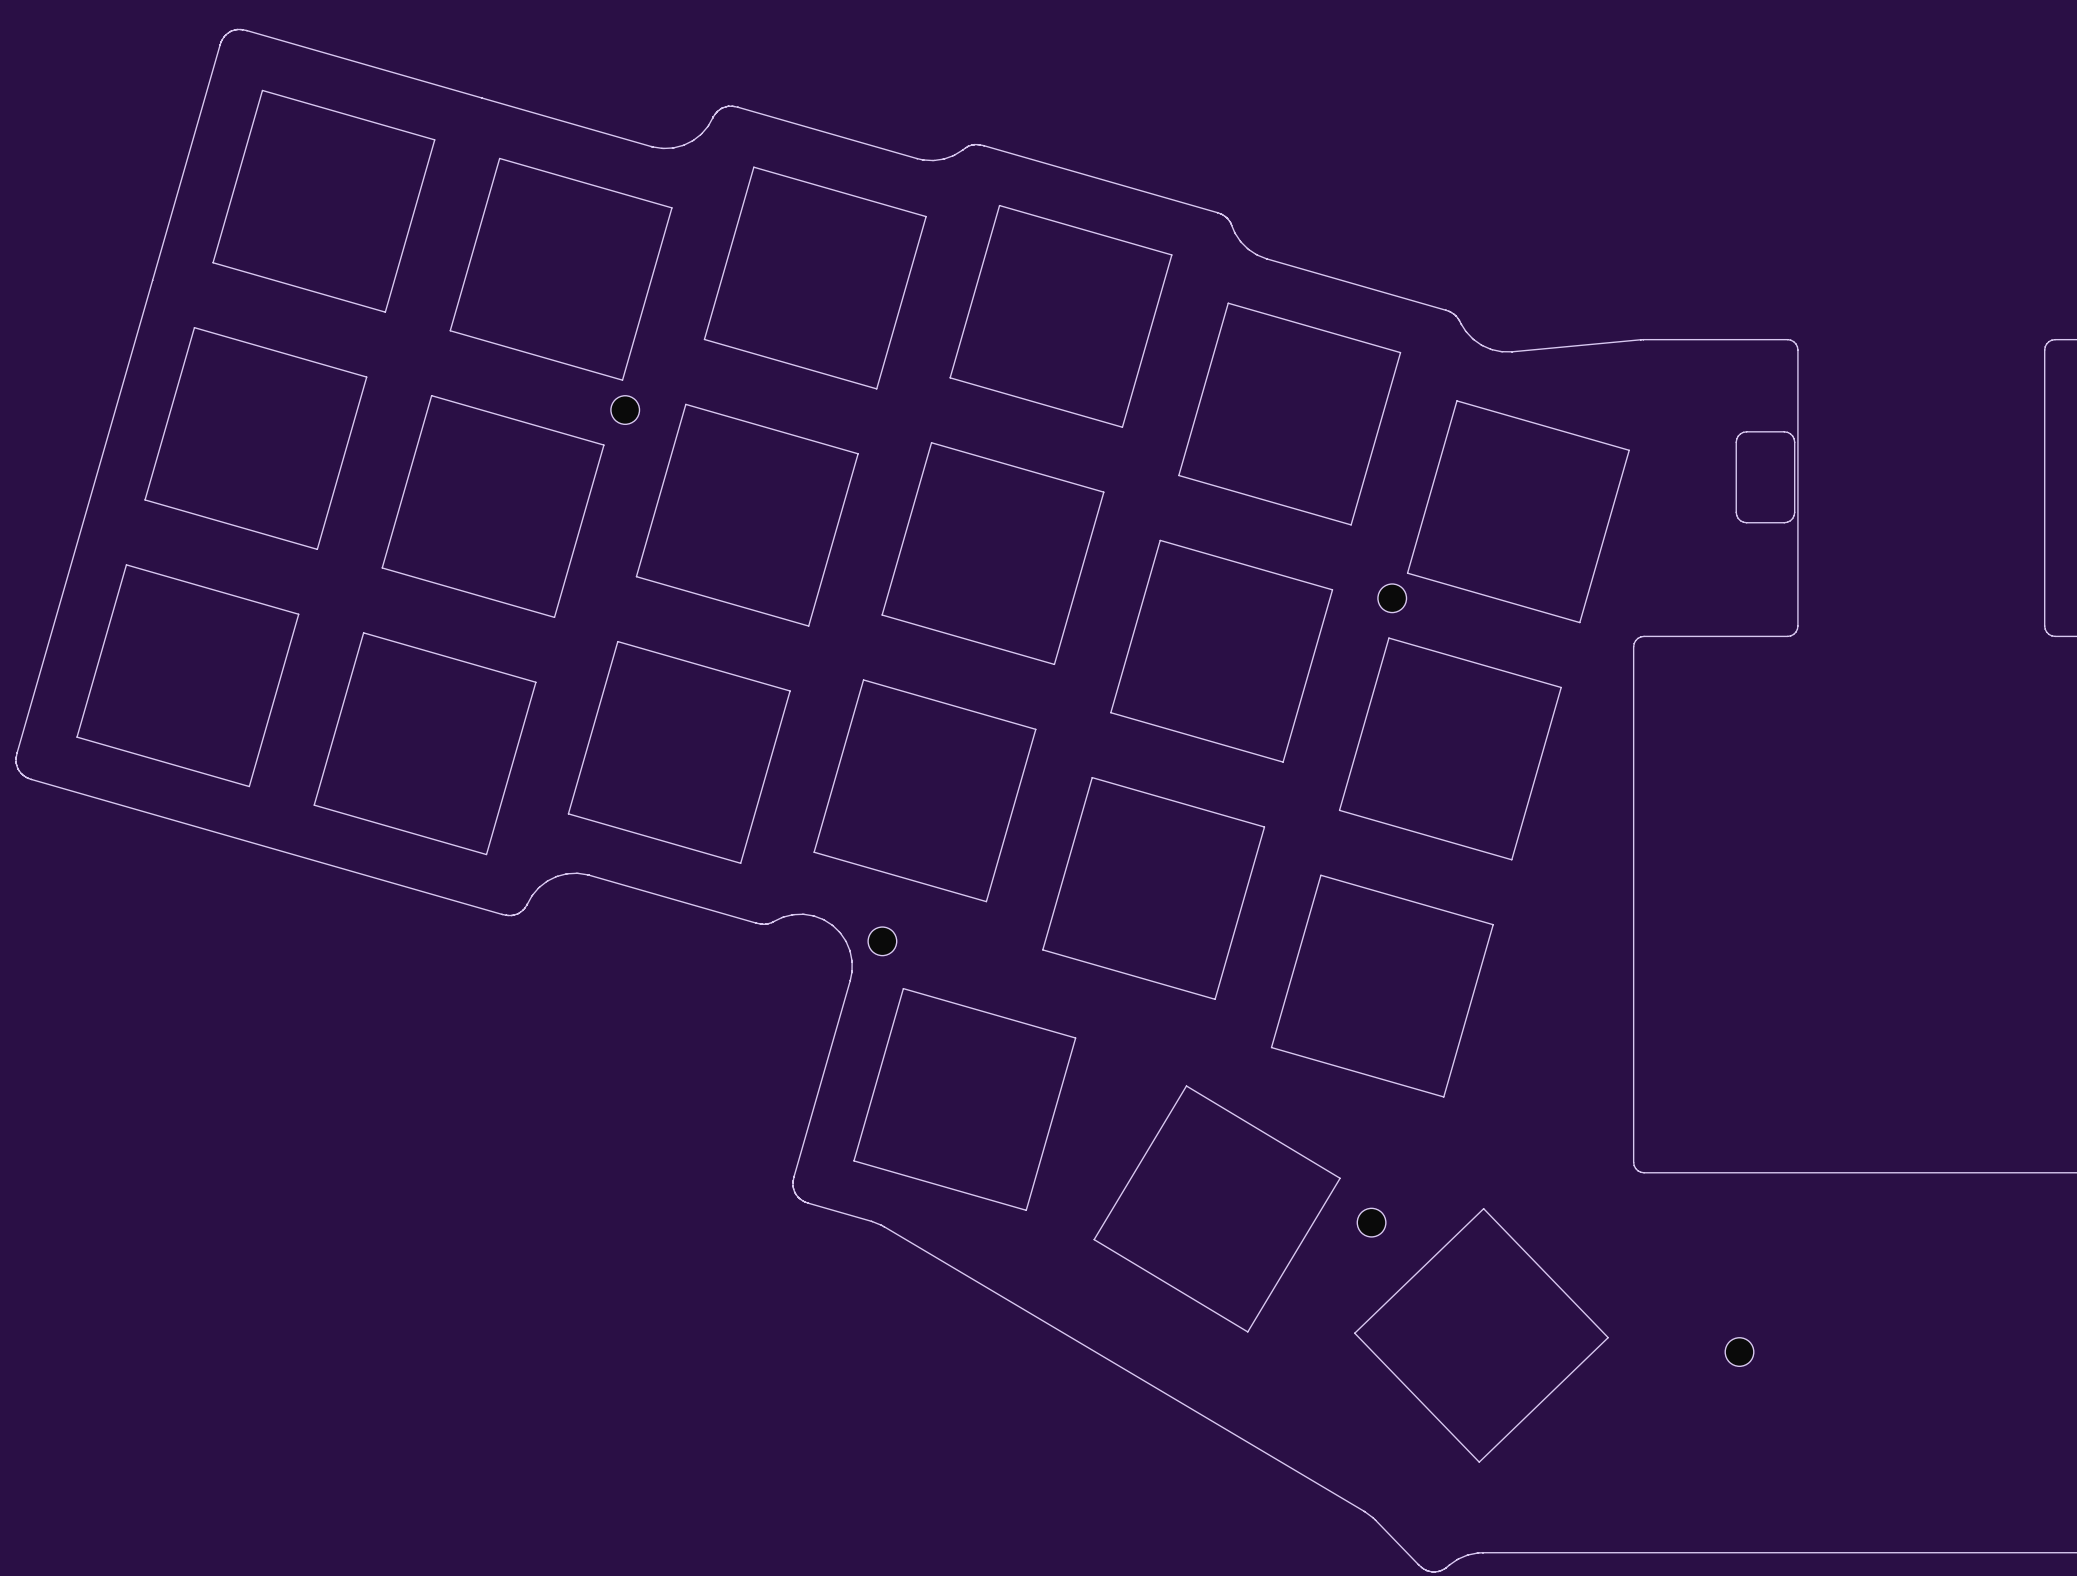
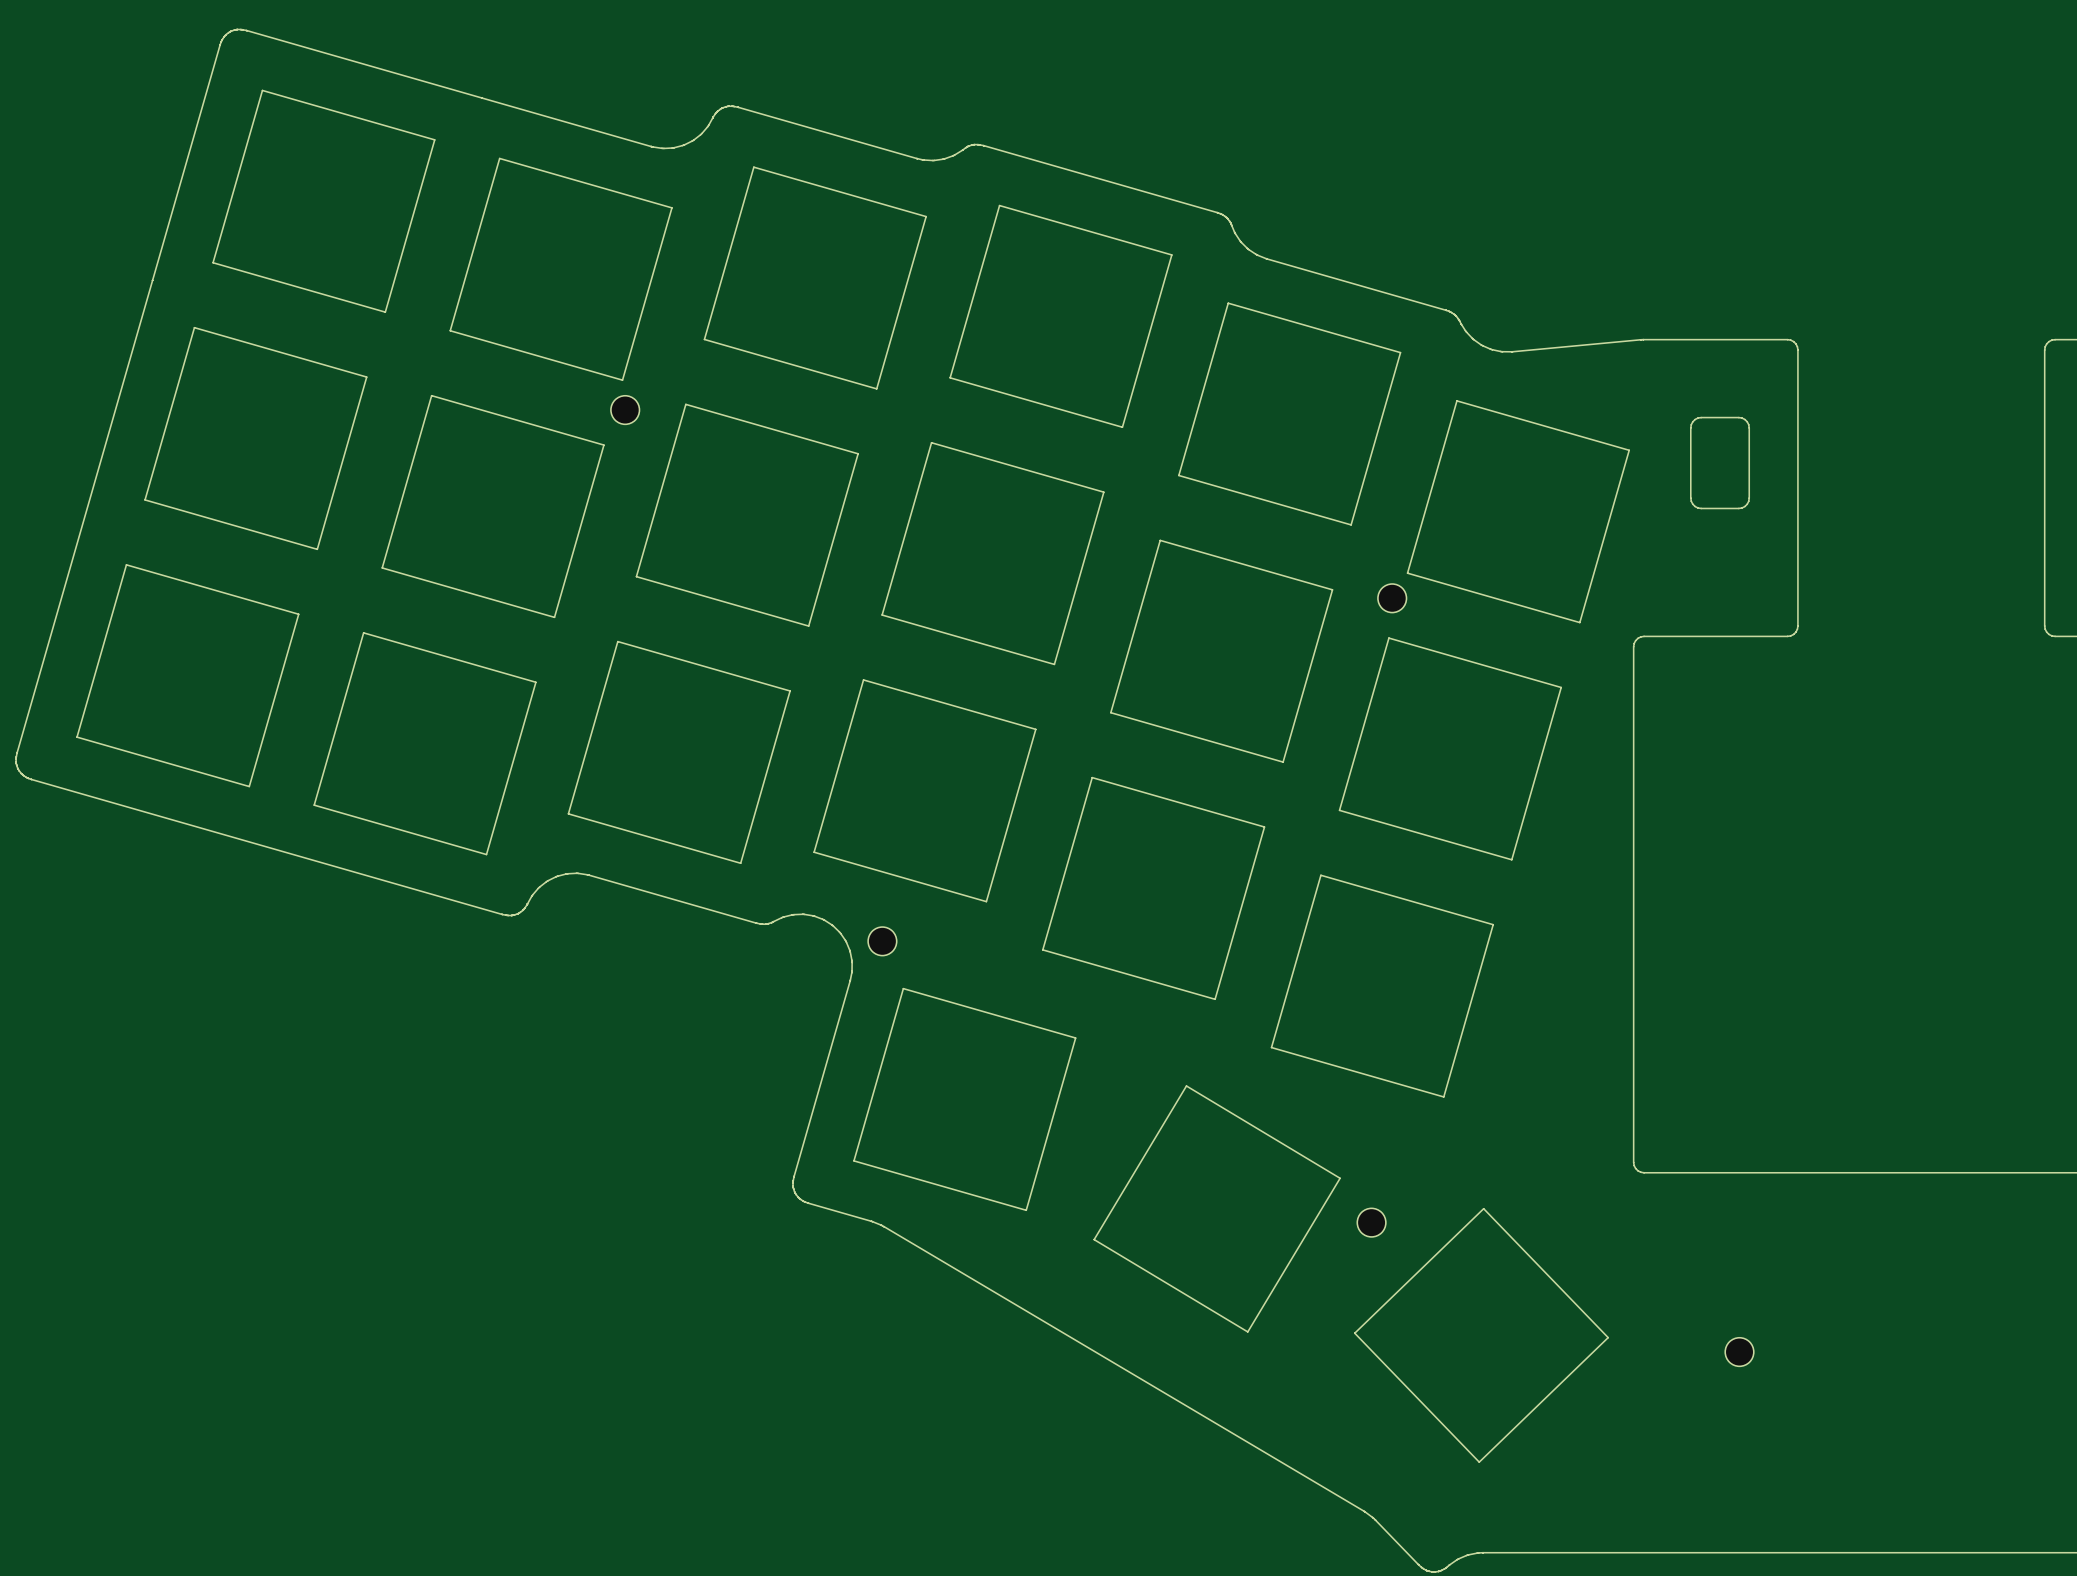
board edge: (1784, 431) (1790, 433) (1794, 442) (1794, 515) (1790, 520) (1784, 522) (1743, 522) (1738, 518) (1736, 512) (1736, 439) (1740, 433) (1746, 431) (1784, 431) -> (1738, 417) (1744, 419) (1749, 427) (1748, 501) (1744, 506) (1738, 508) (1697, 507) (1692, 504) (1690, 498) (1691, 424) (1695, 419) (1701, 417) (1738, 417)

